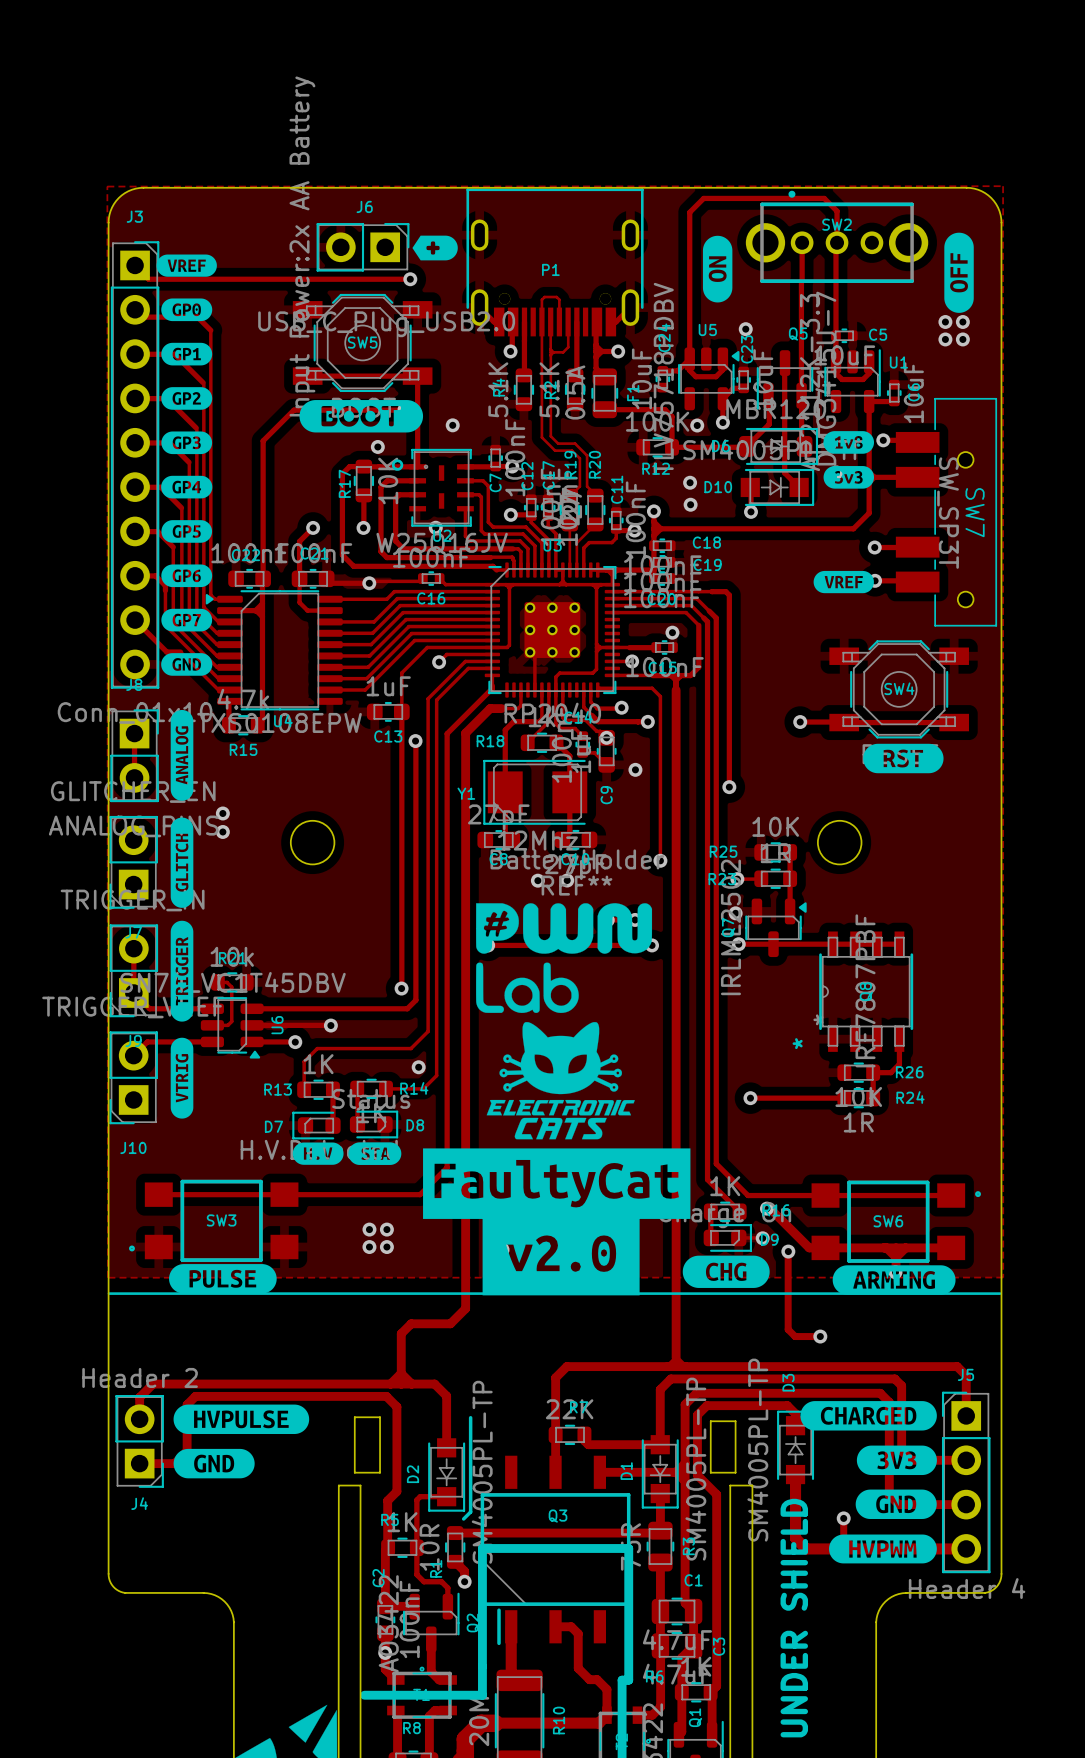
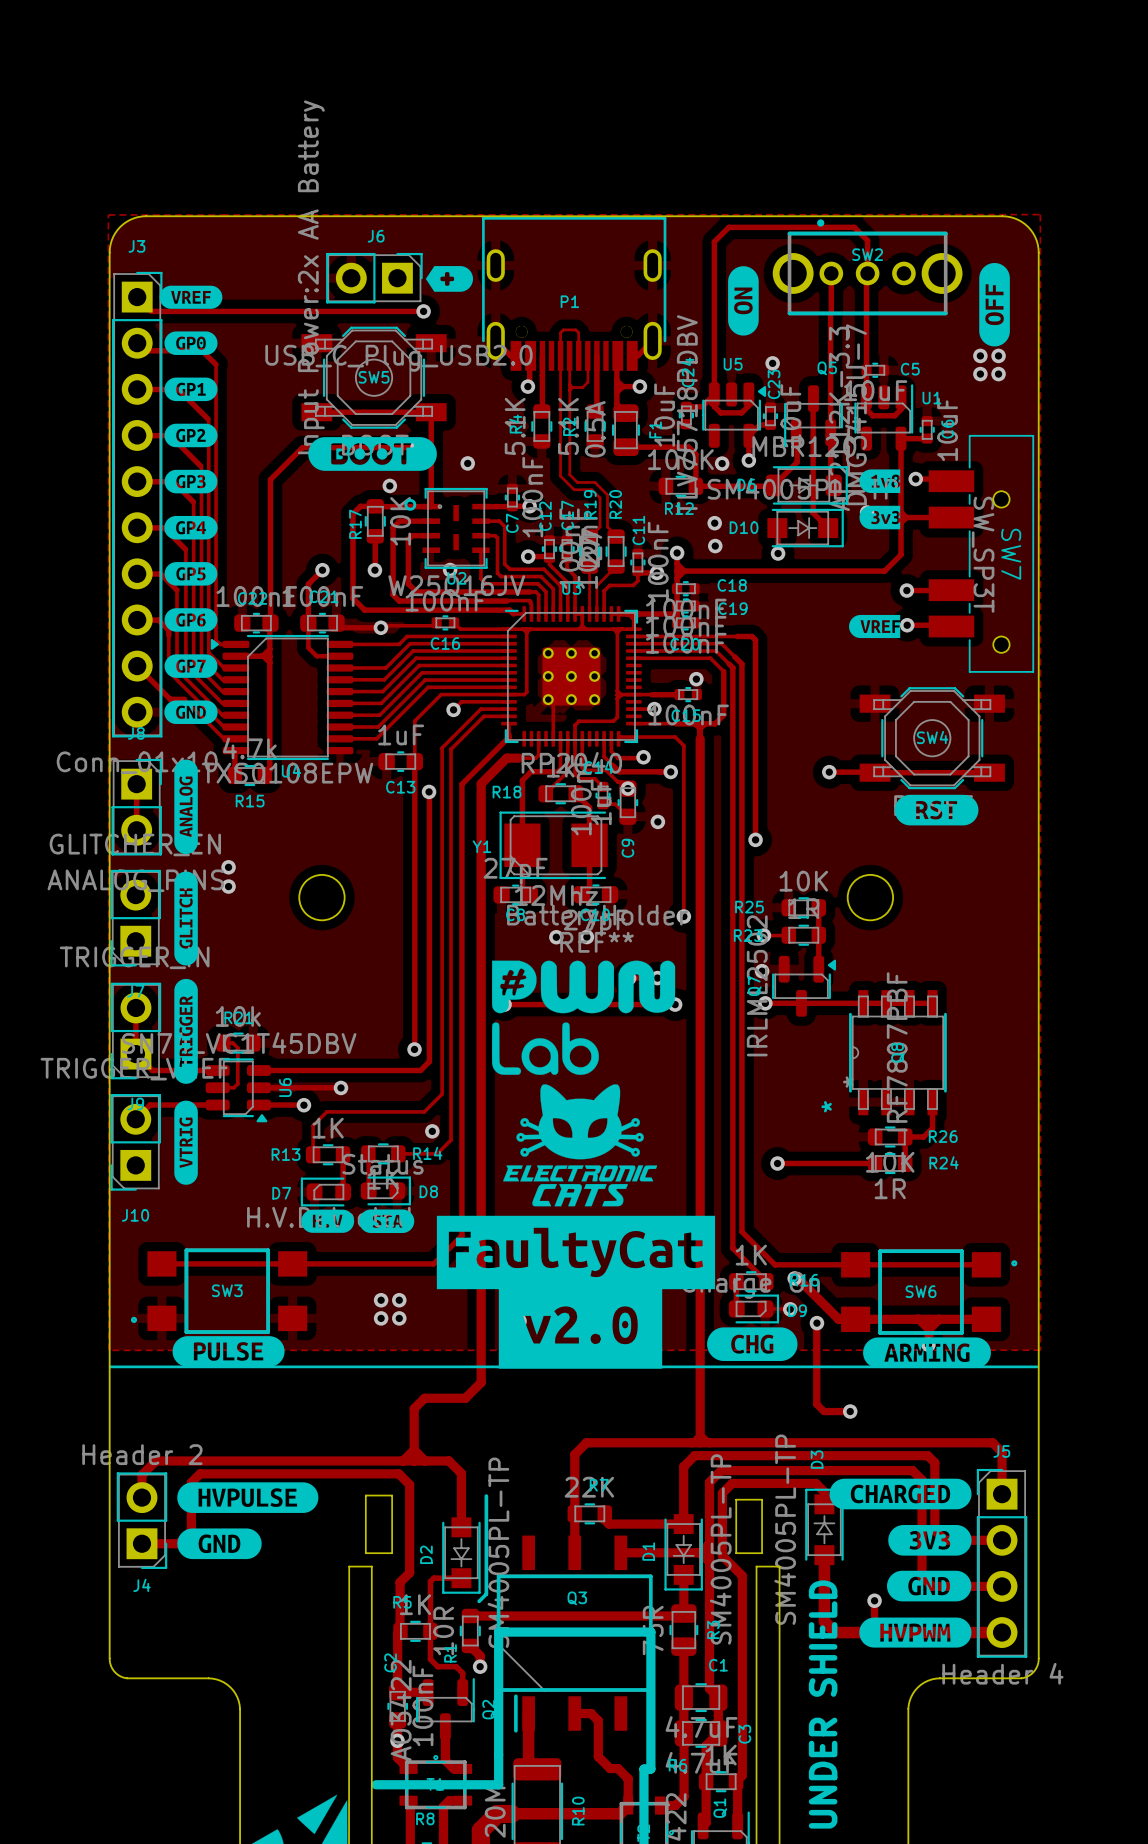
drawing shape: [823, 431, 875, 454] -> [859, 469, 901, 494]
drawing shape: [823, 466, 875, 489] -> [859, 505, 901, 530]
drawing shape: [813, 570, 874, 594] -> [849, 614, 901, 639]

